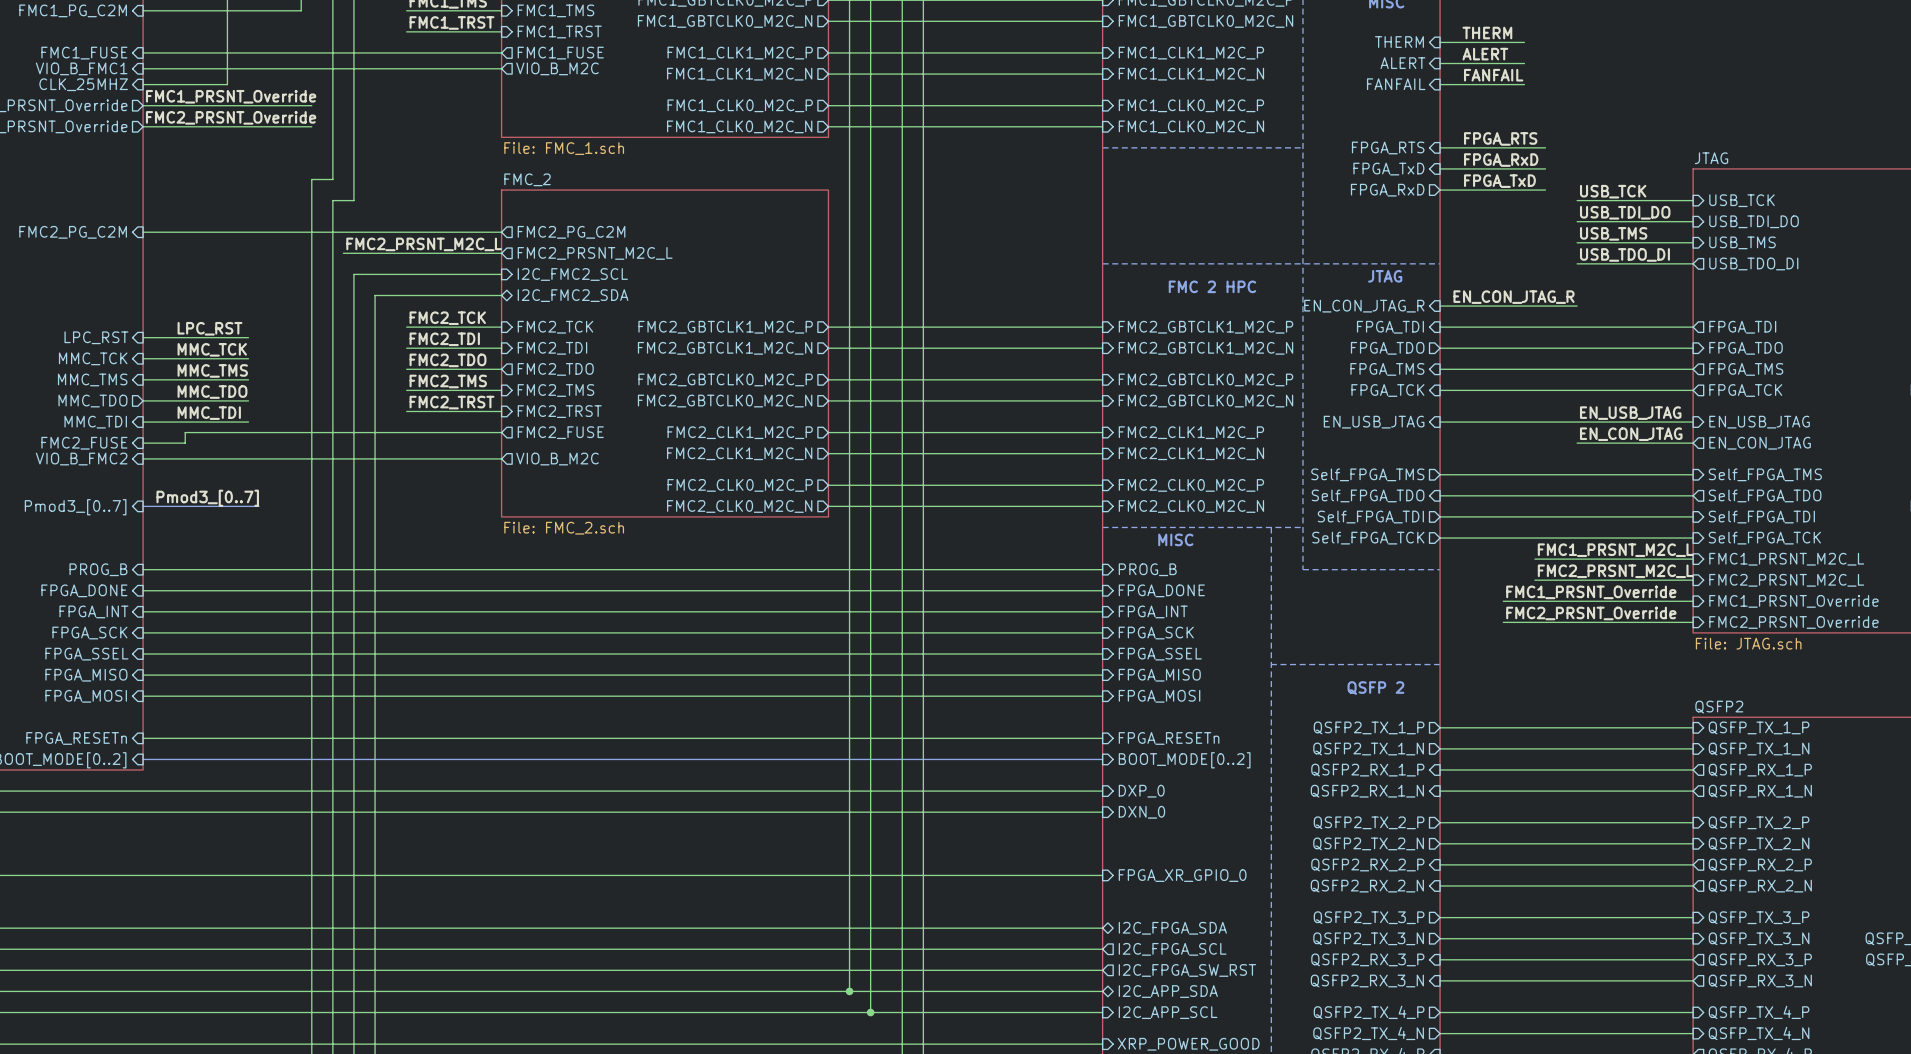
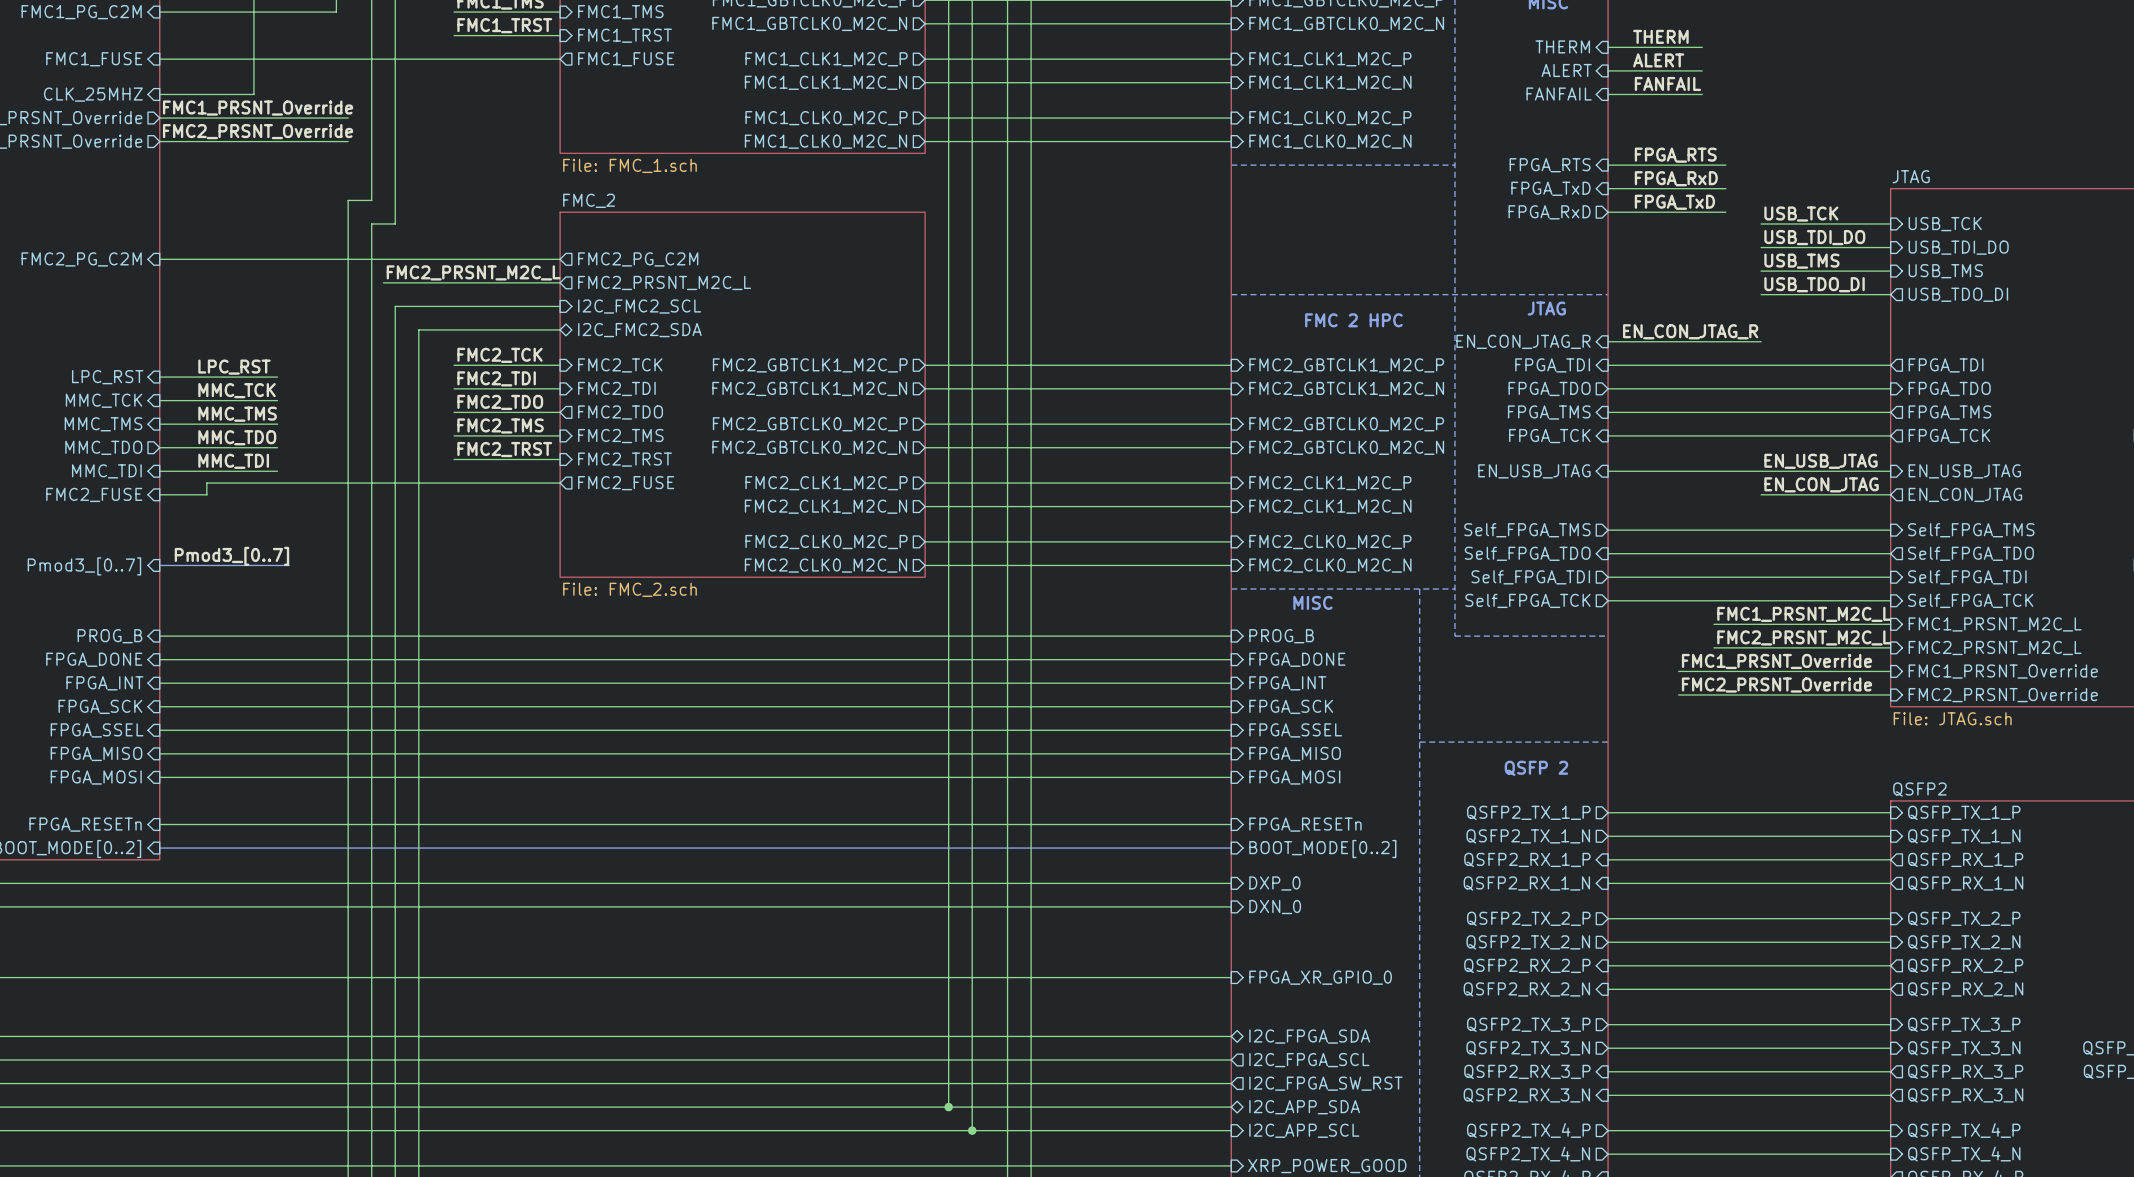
sheet pin: VIO_B_FMC1 (81, 68) -> none
wire: (143, 68) (501, 68) -> none
sheet pin: VIO_B_M2C (557, 68) -> none
wire: (143, 458) (501, 458) -> none
sheet pin: VIO_B_FMC2 (81, 459) -> none
sheet pin: VIO_B_M2C (557, 459) -> none

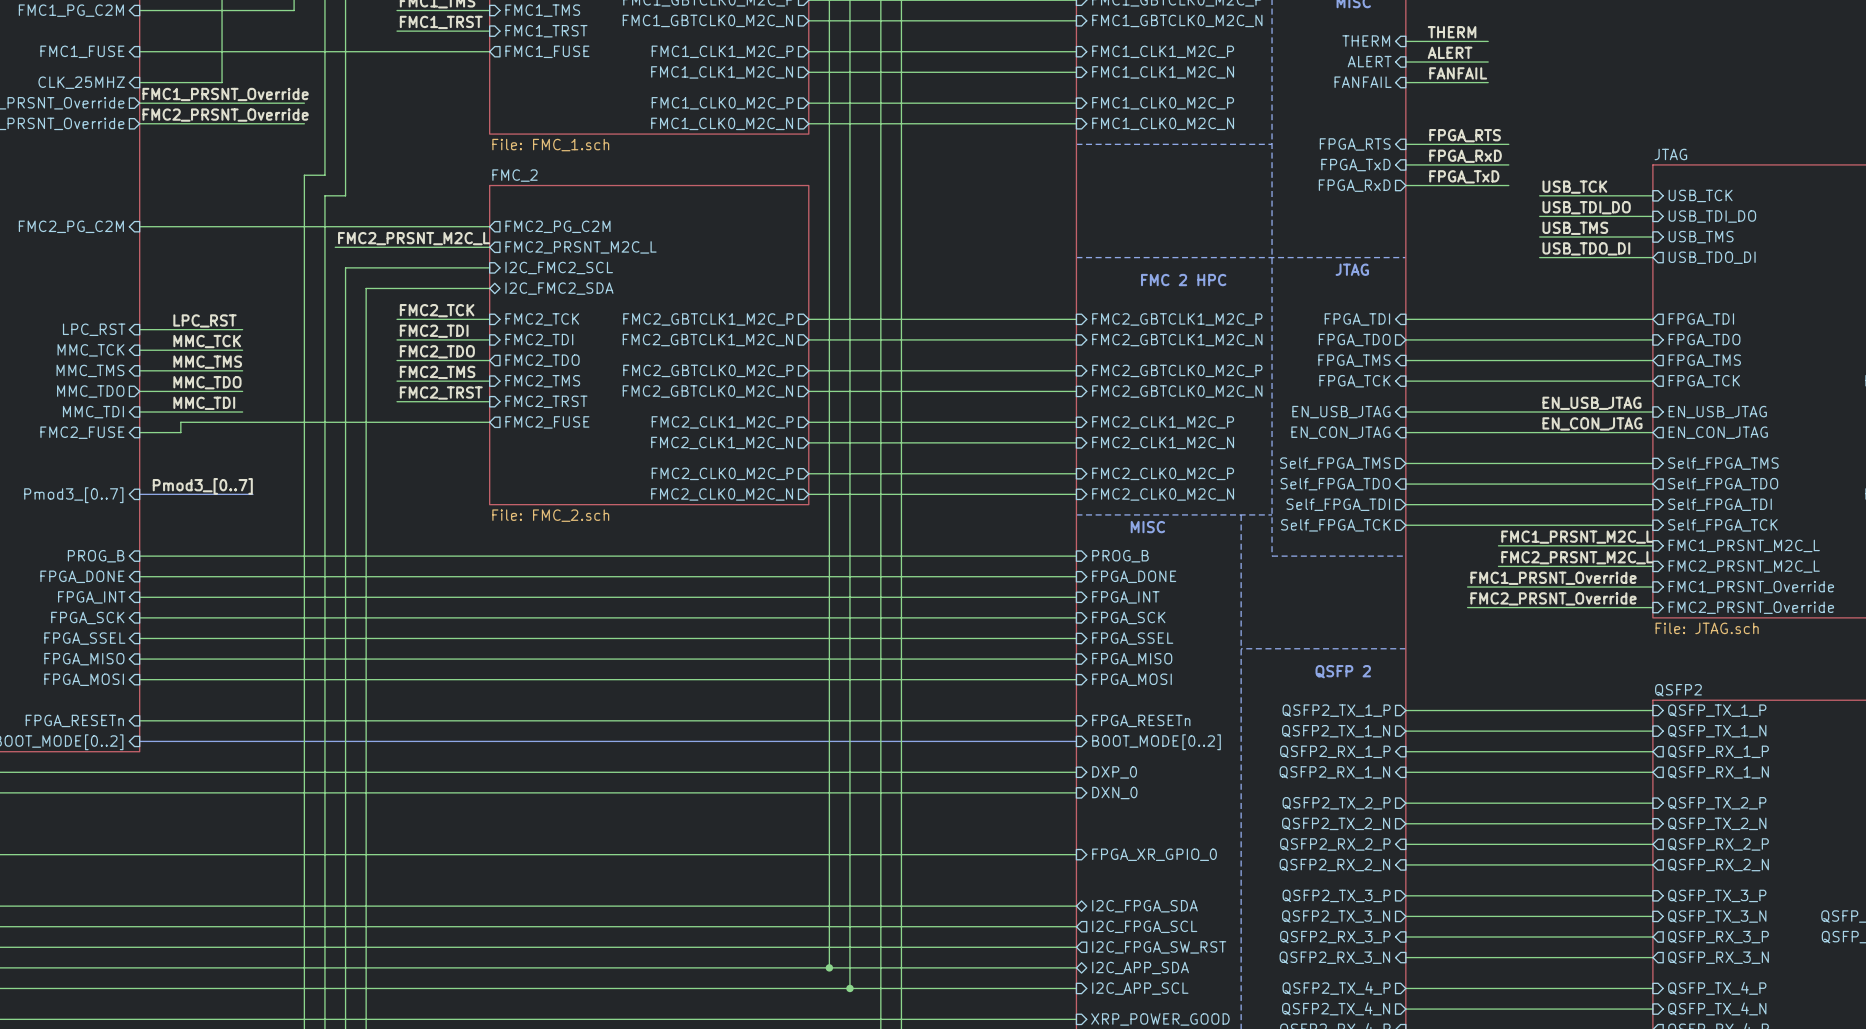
label: EN_CON_JTAG_R (1690, 331) -> none
sheet pin: EN_CON_JTAG_R (1523, 341) -> none
wire: (1608, 341) (1761, 341) -> (1405, 432) (1539, 432)
sheet pin: none -> EN_CON_JTAG (1340, 432)

